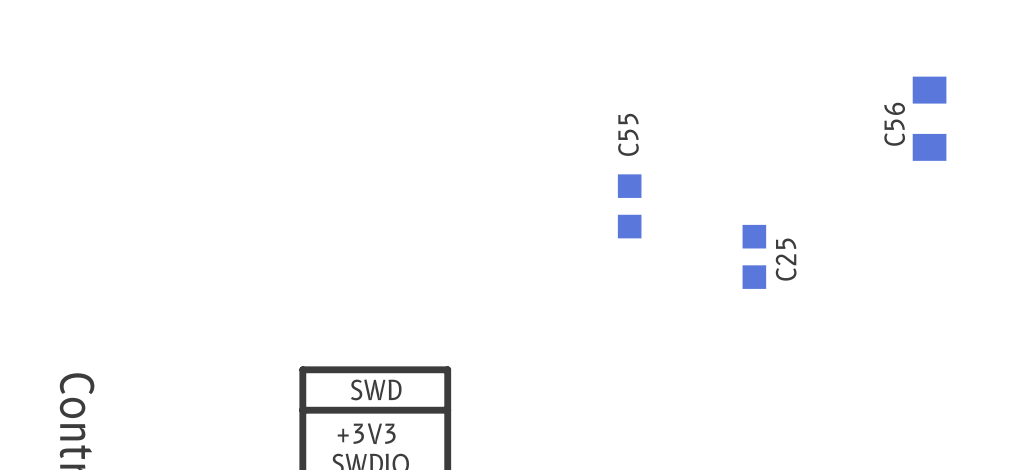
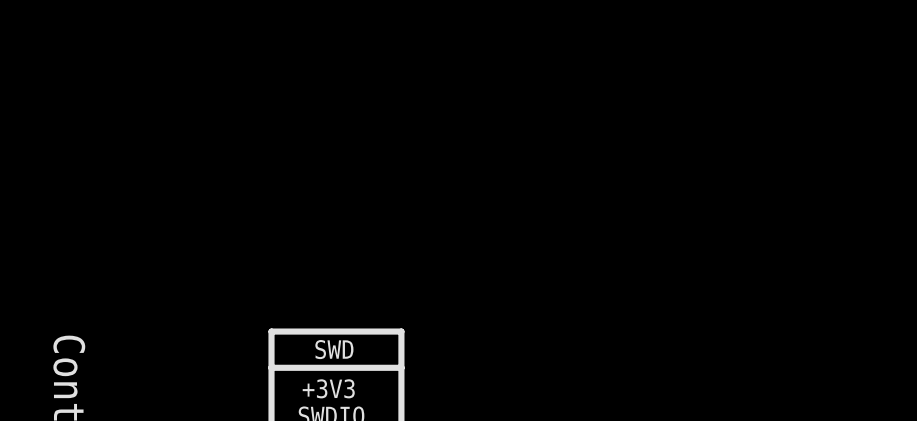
C56: (929, 118) -> none
C55: (629, 206) -> none
C25: (754, 256) -> none

